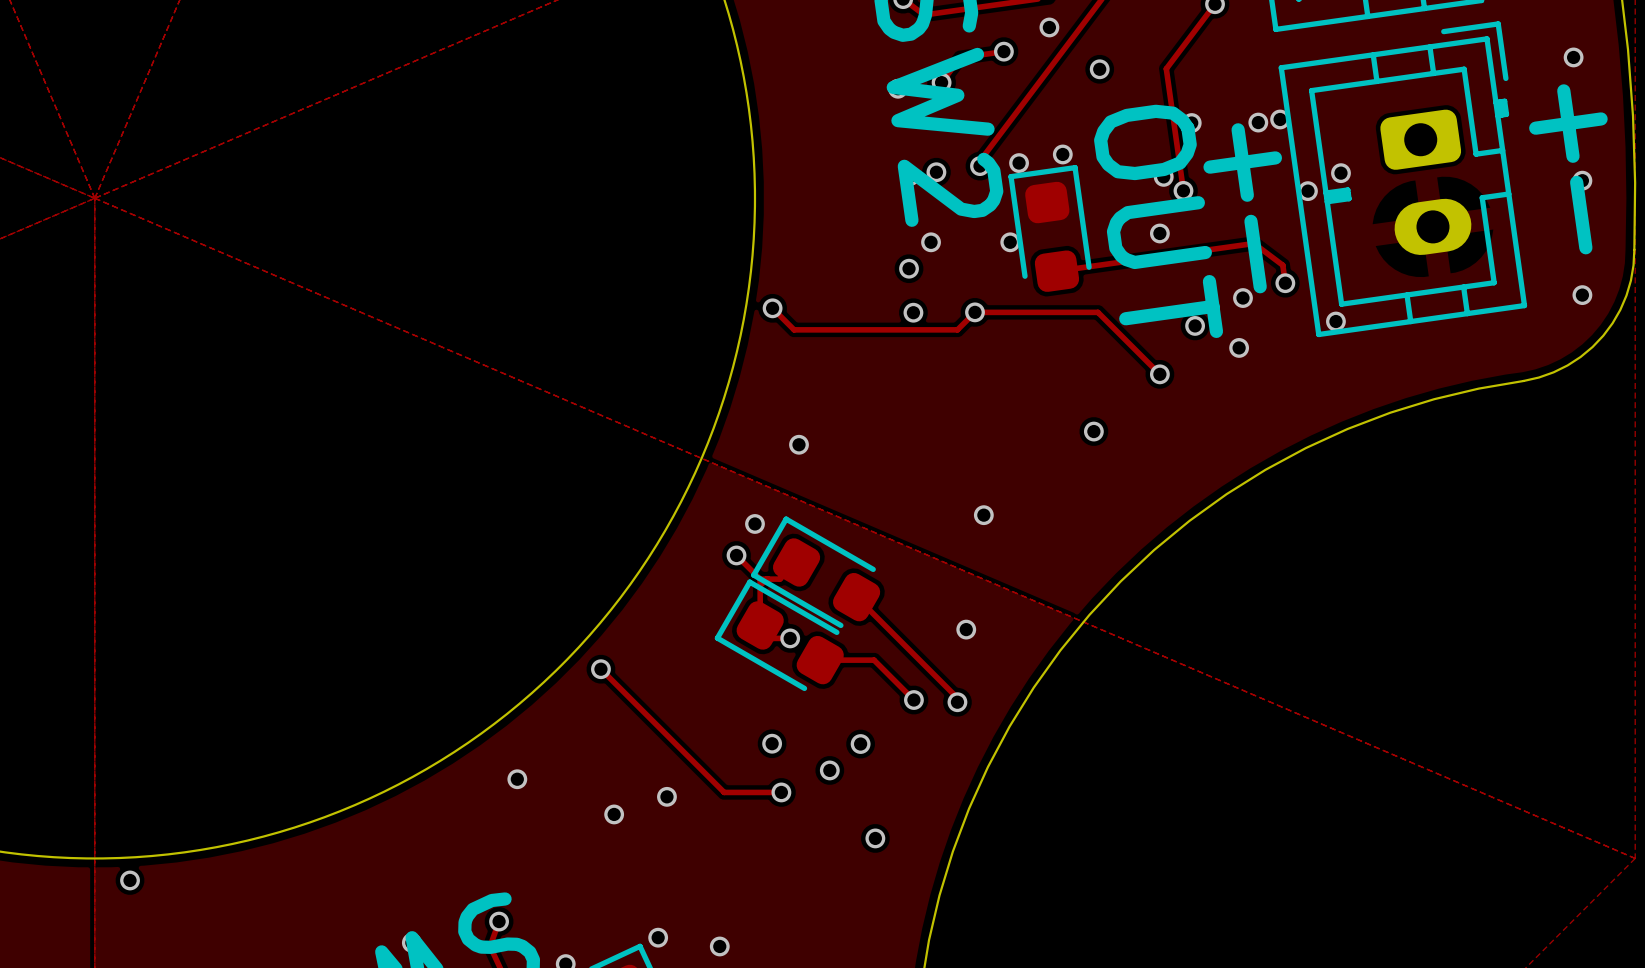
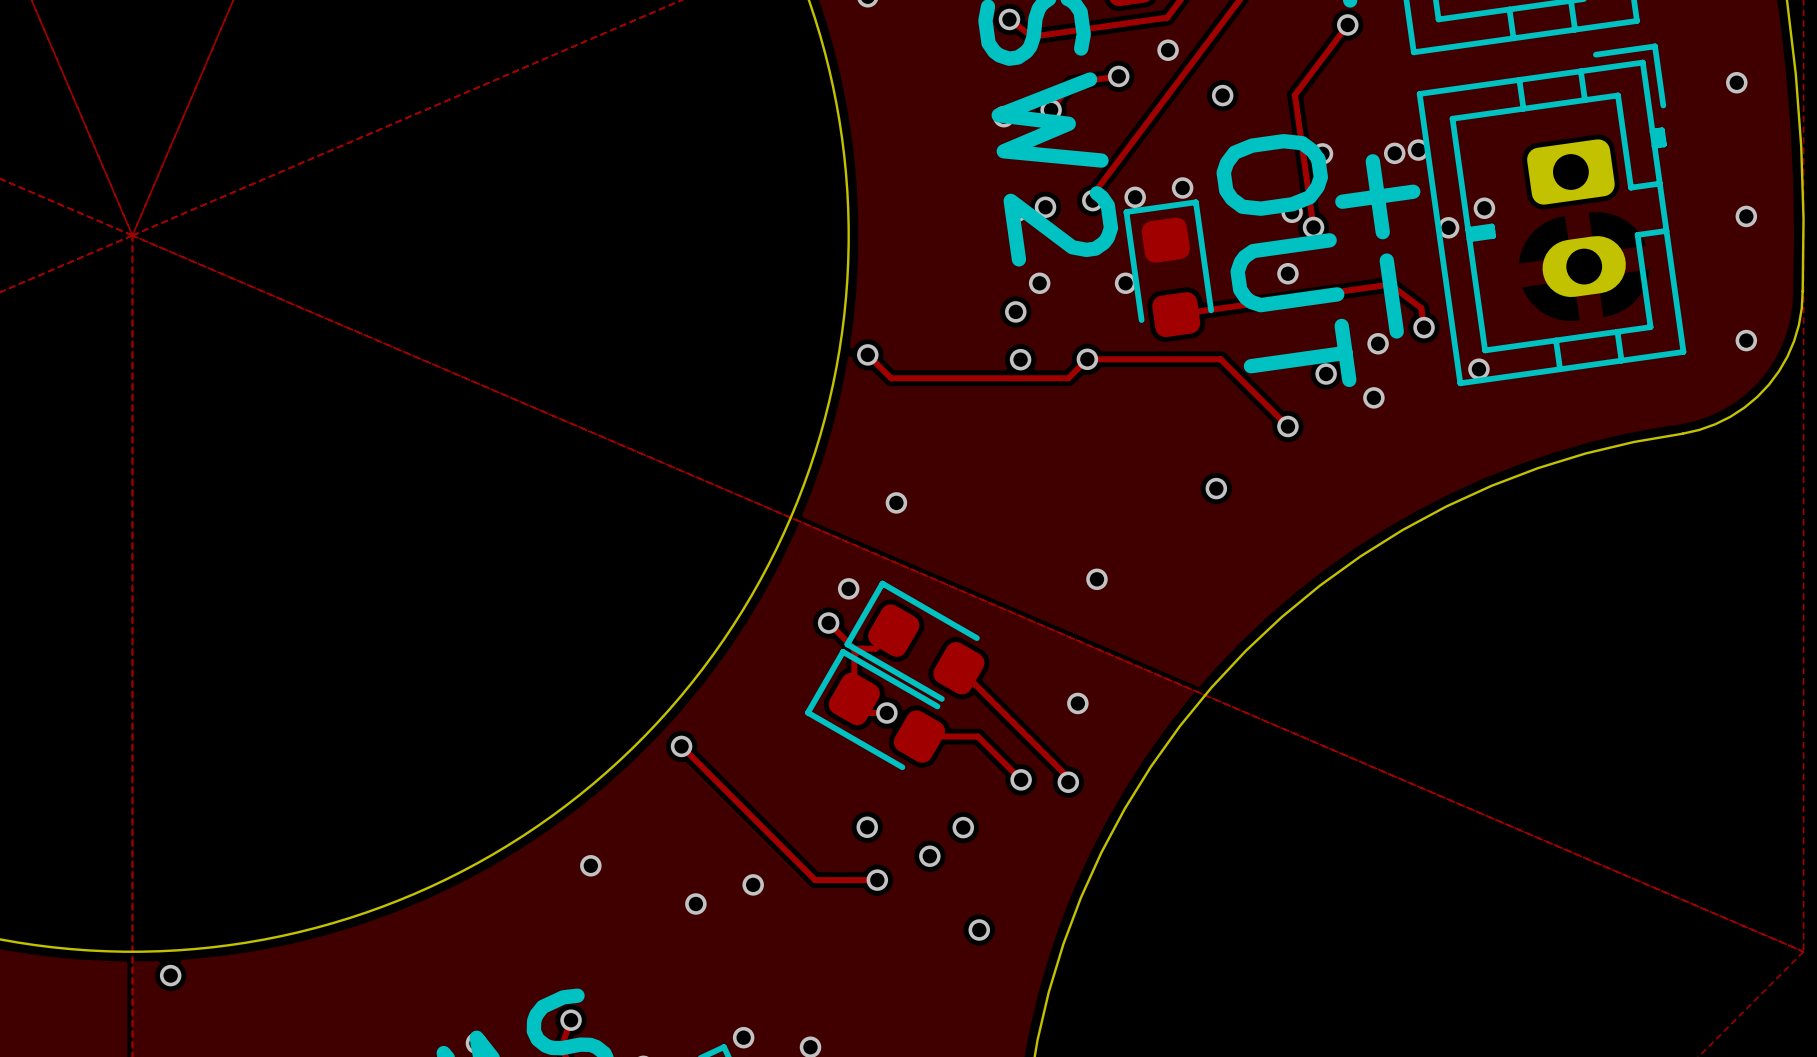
line: (1563, 90) (1573, 156) -> none
line: (1601, 118) (1535, 128) -> none
line: (1576, 182) (1585, 247) -> none

